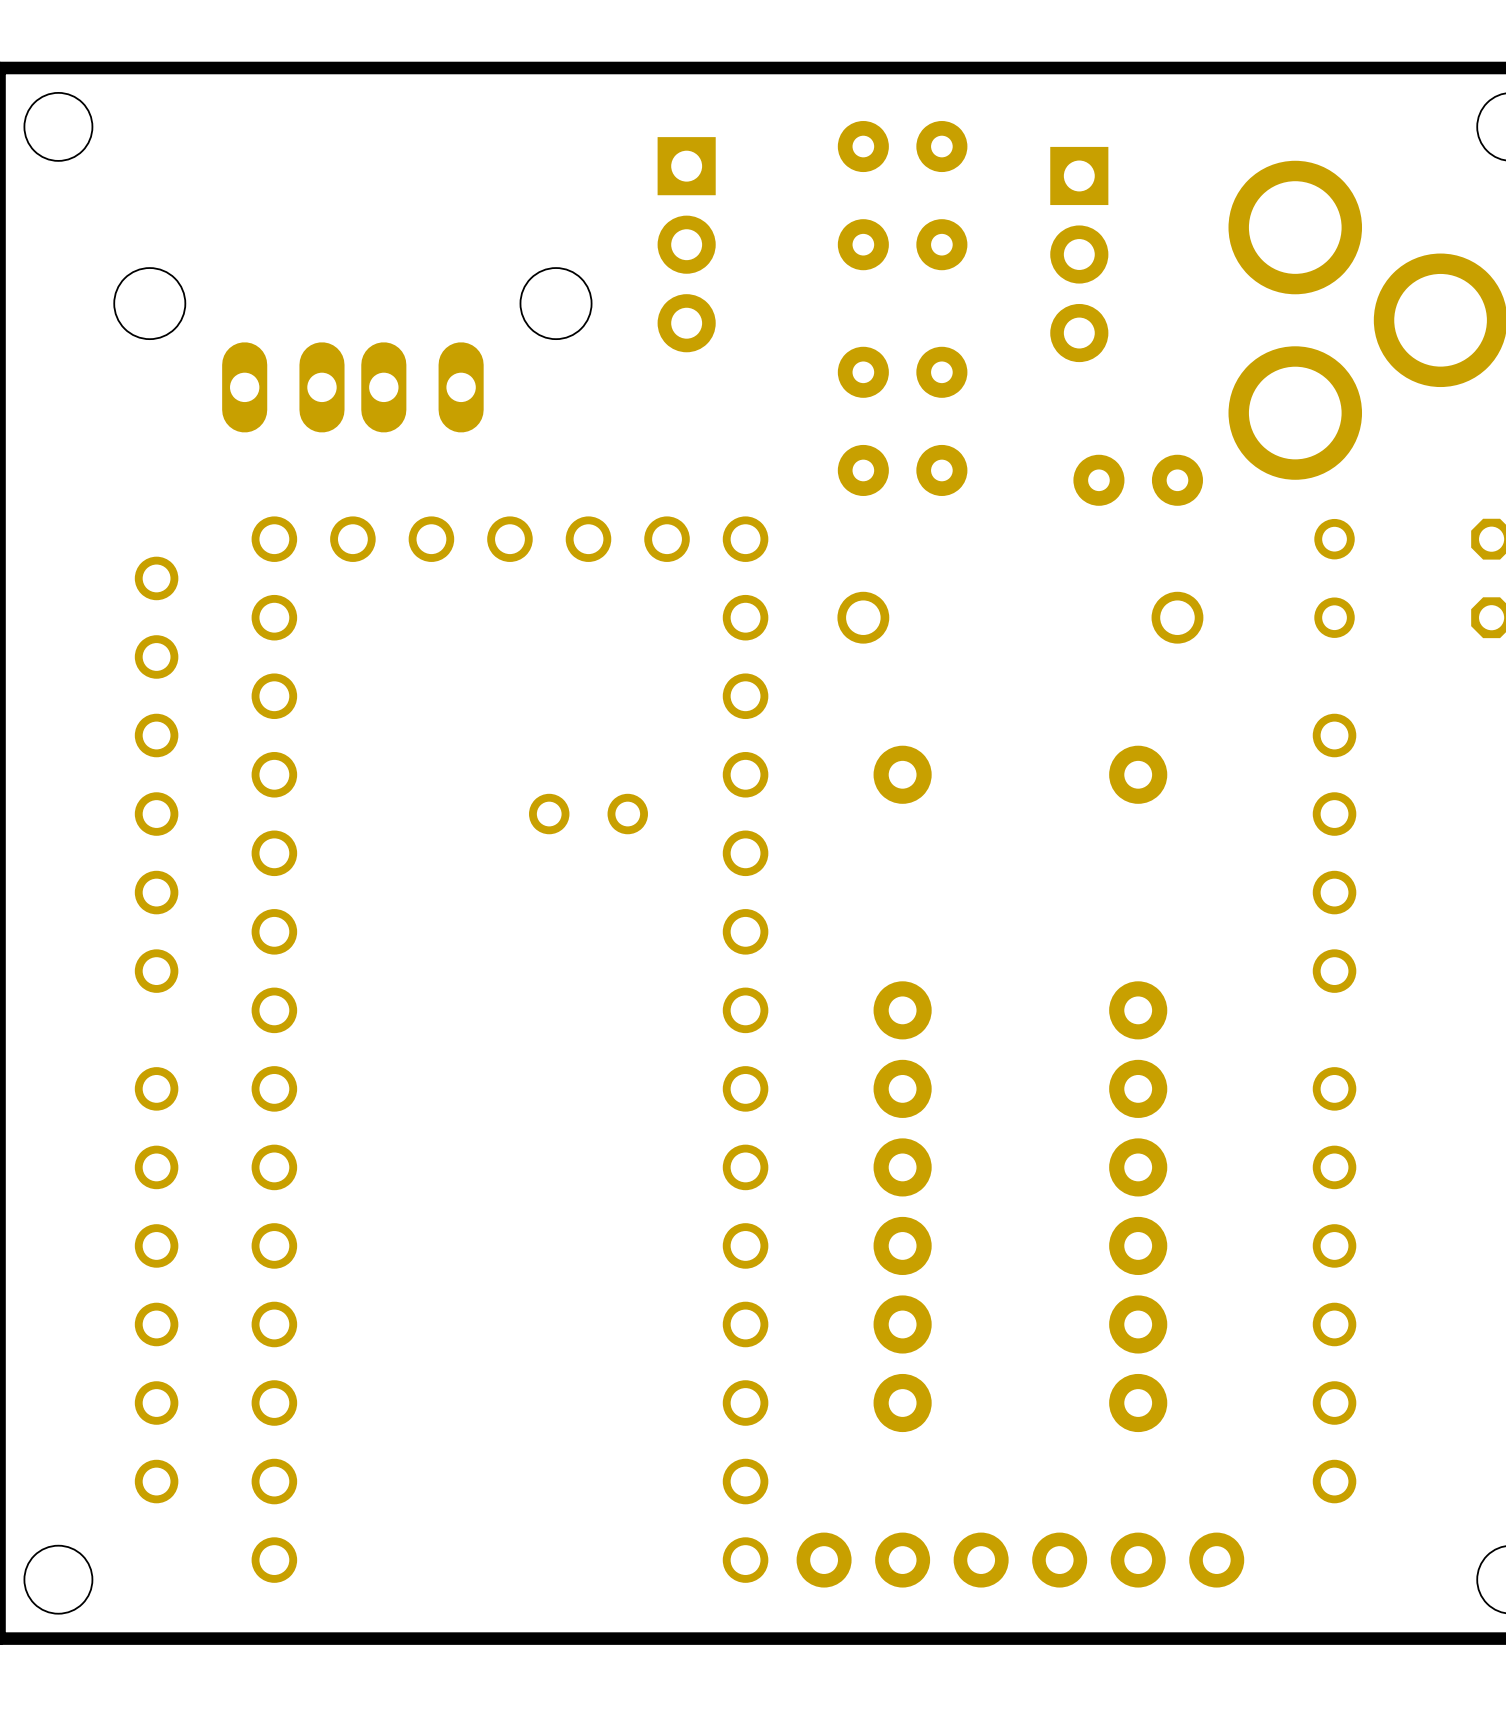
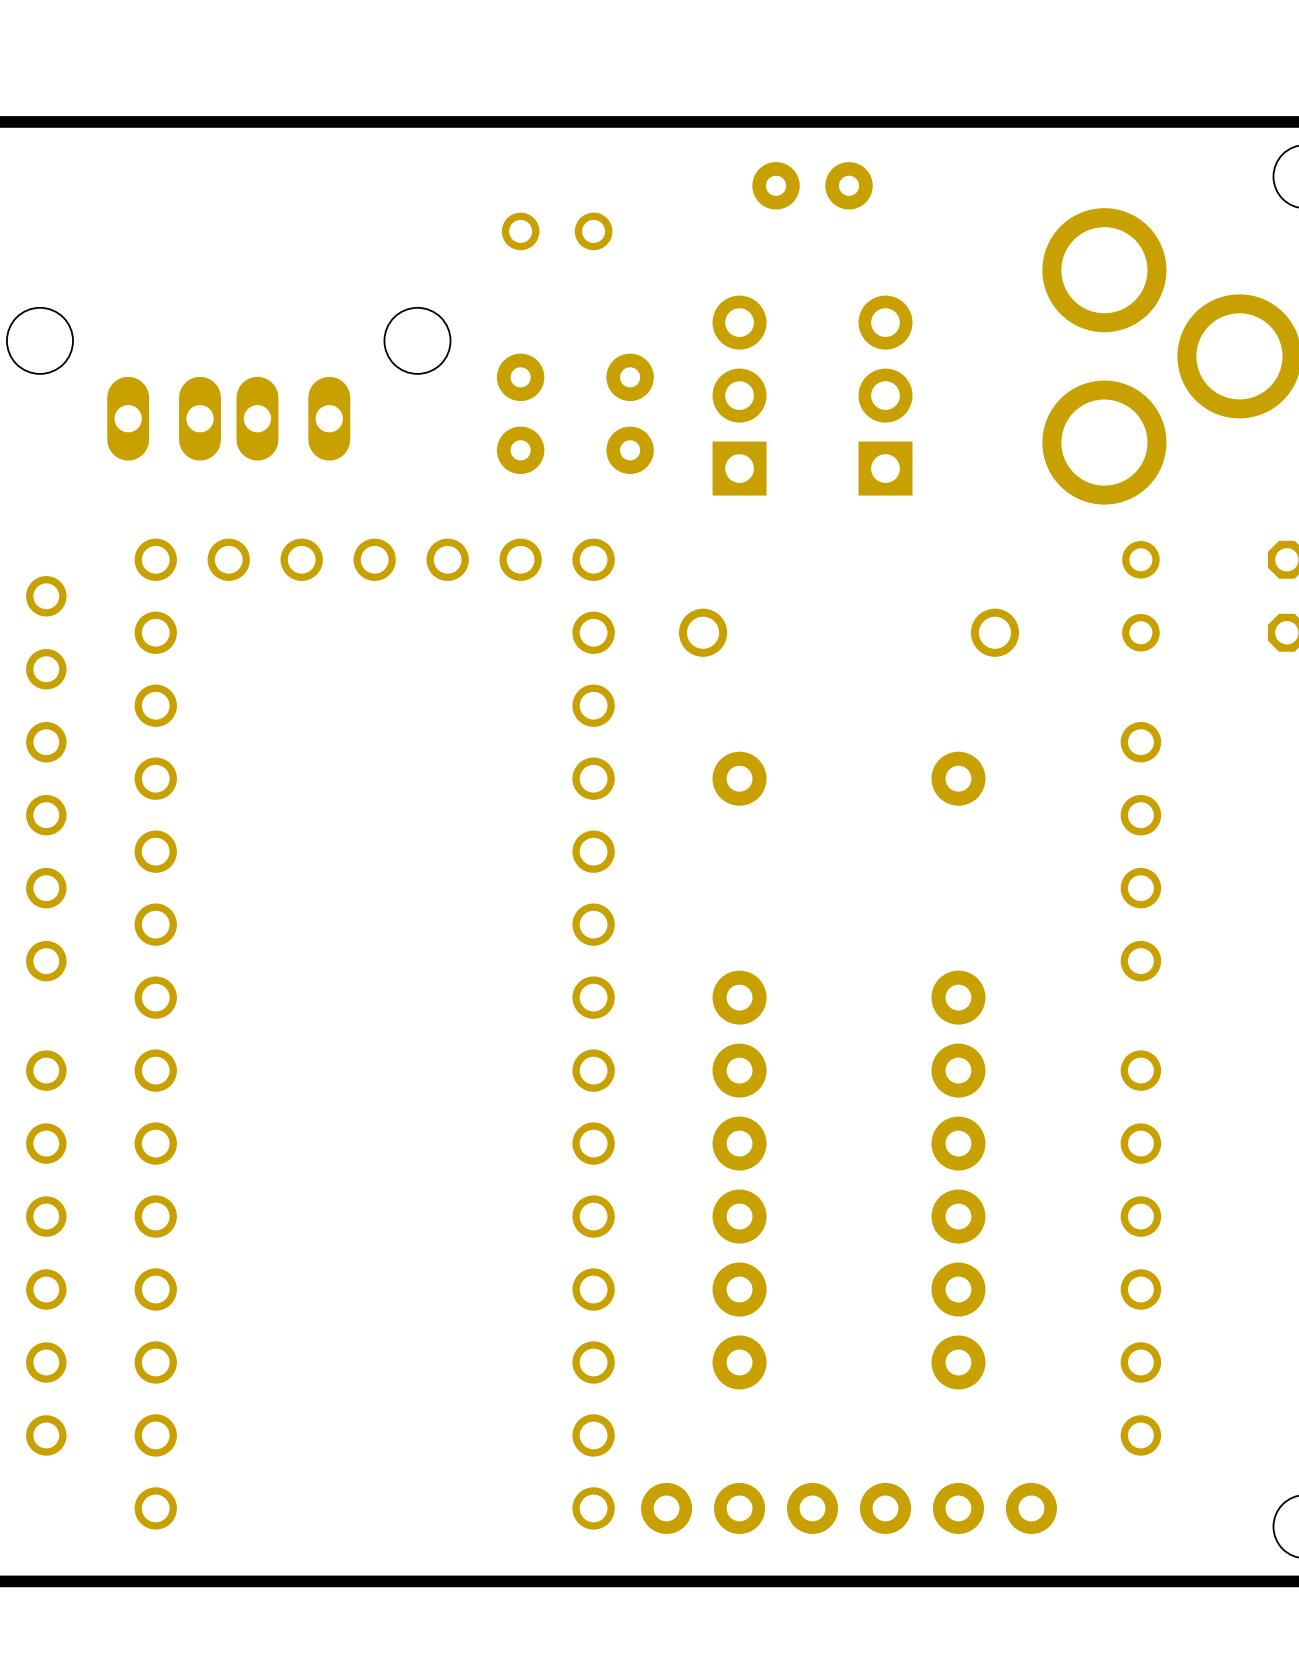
part: none -> (812, 185)
part: (902, 146) -> none
part: (686, 244) -> none
part: (902, 244) -> none
part rotation: 0° (1079, 254) -> 180° (885, 395)
part footprint: [837, 346, 968, 398] -> [712, 295, 767, 496]
part: none -> (520, 413)
part: none -> (630, 413)
part: (902, 470) -> none
part: (1138, 480) -> none
part position: (588, 814) -> (557, 231)

